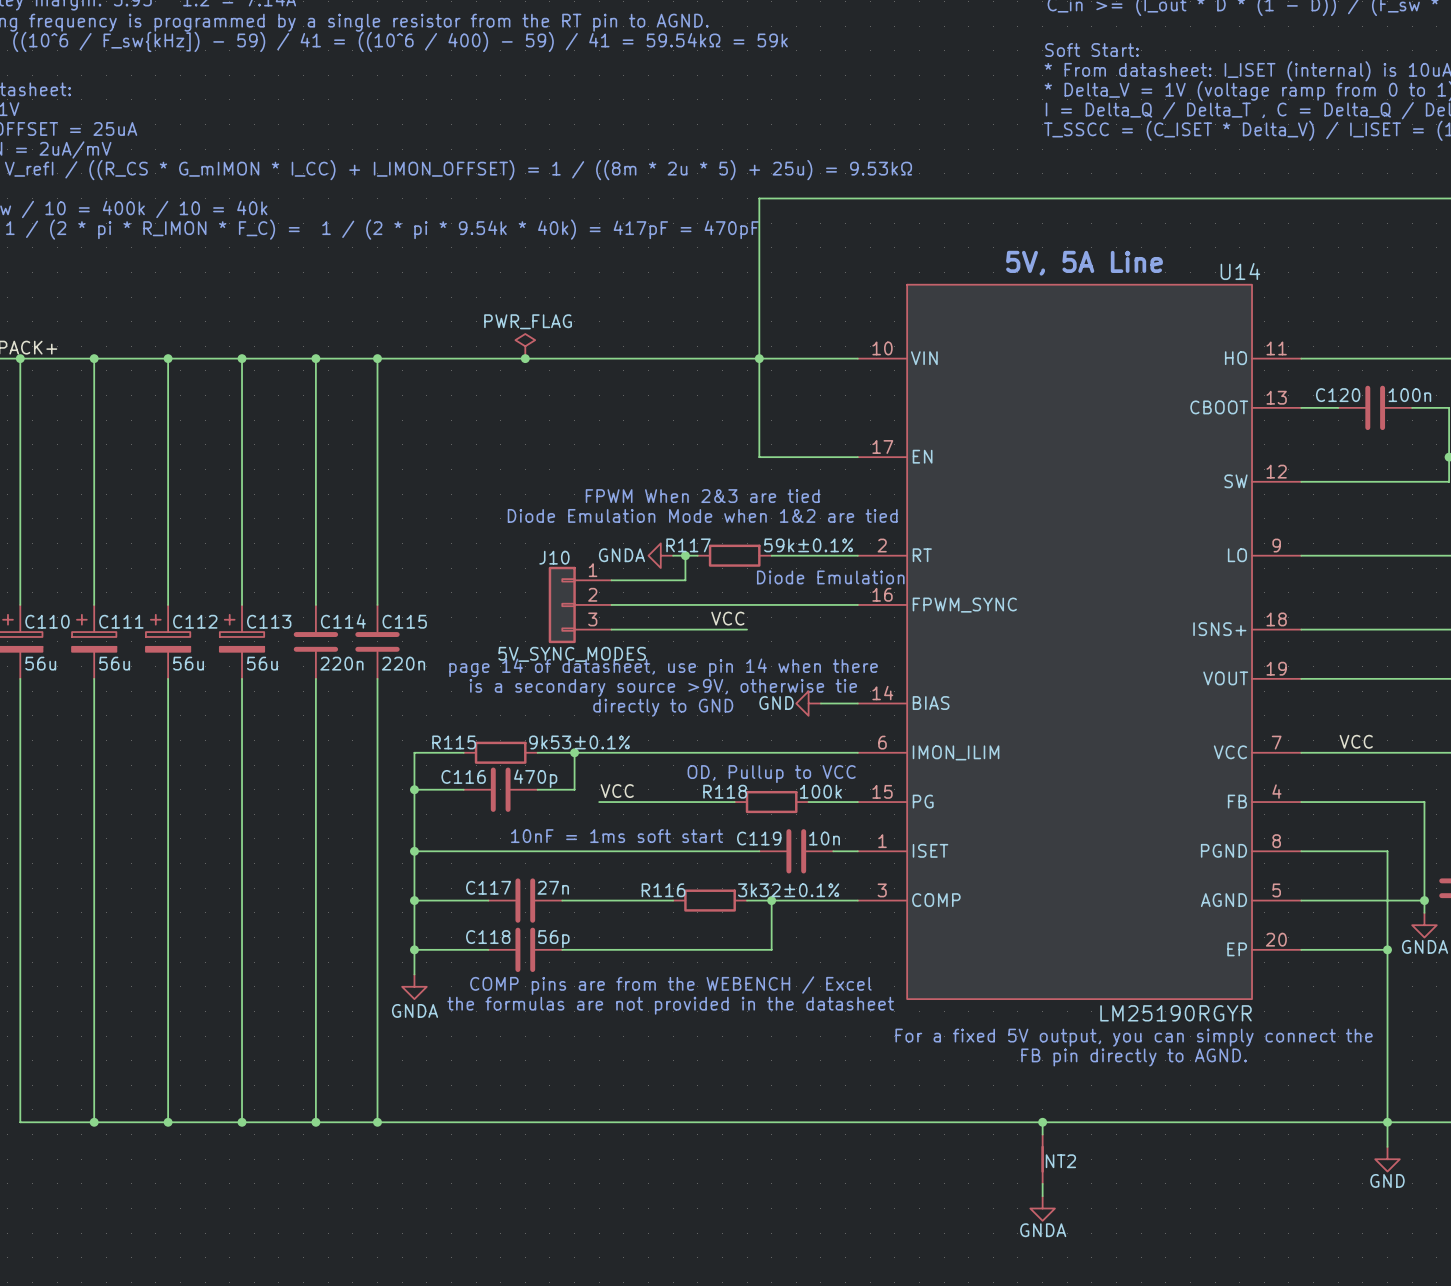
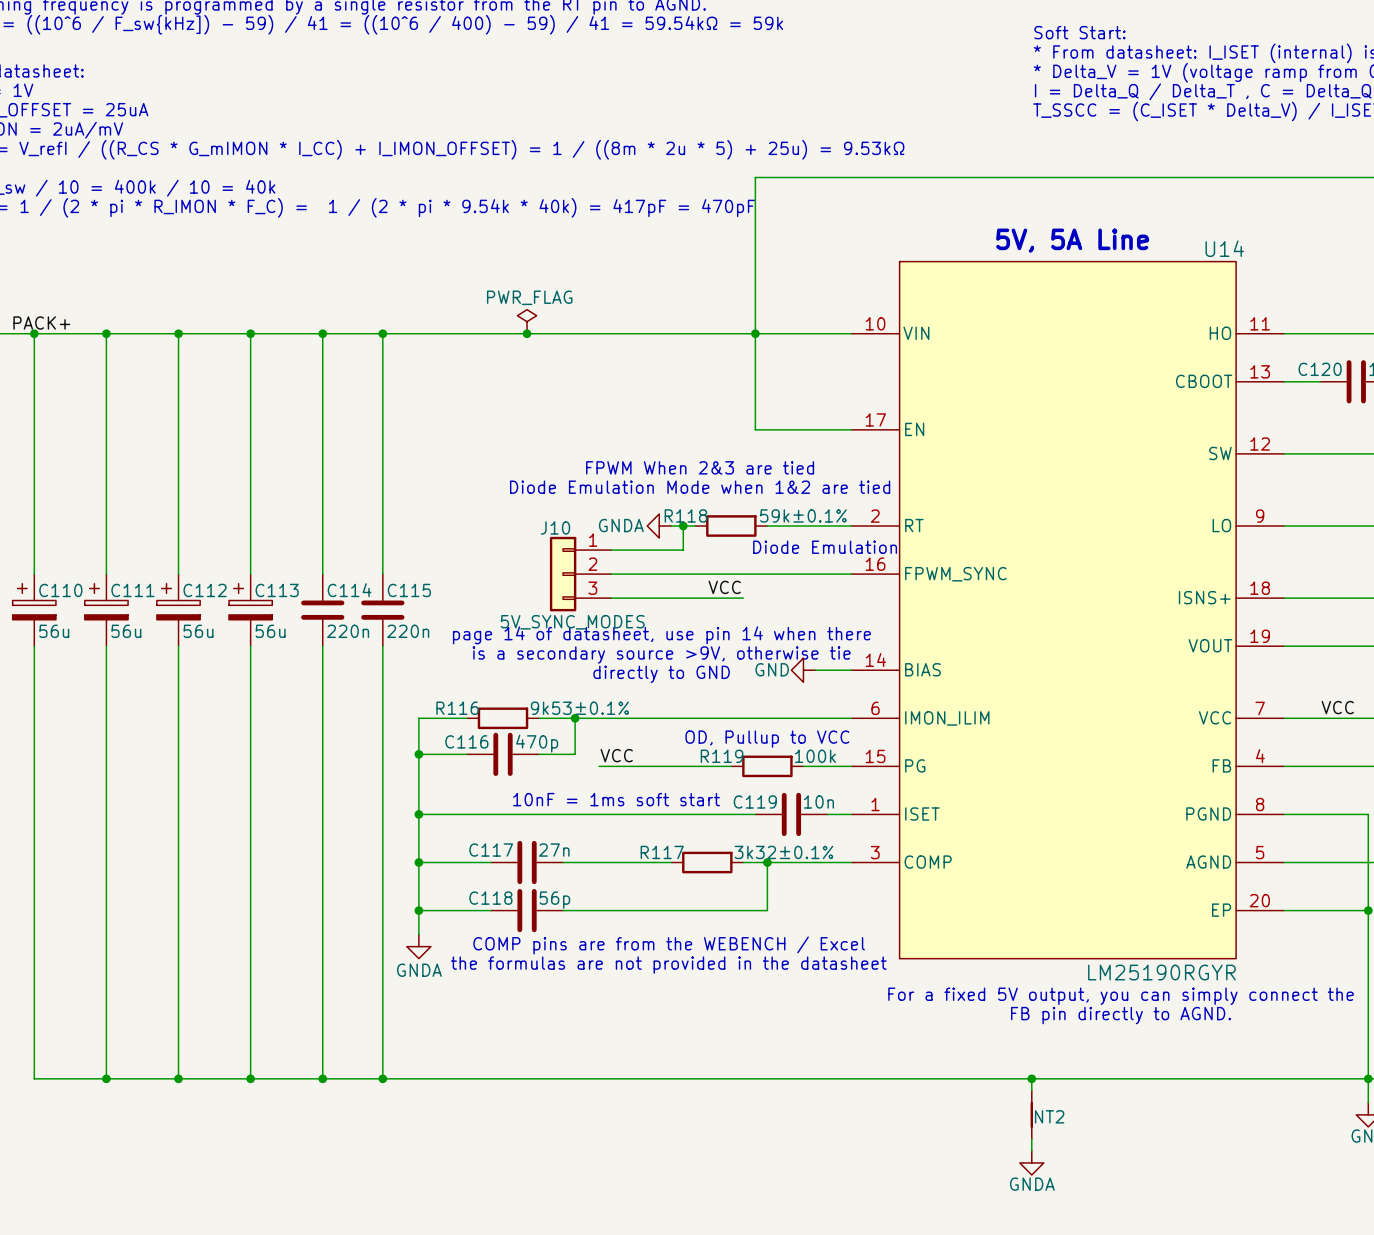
R117 name: R117 (688, 545) -> R118 (685, 515)
R115 name: R115 (454, 742) -> R116 (457, 708)
R118 name: R118 (725, 791) -> R119 (722, 756)
R116 name: R116 (663, 890) -> R117 (662, 852)

